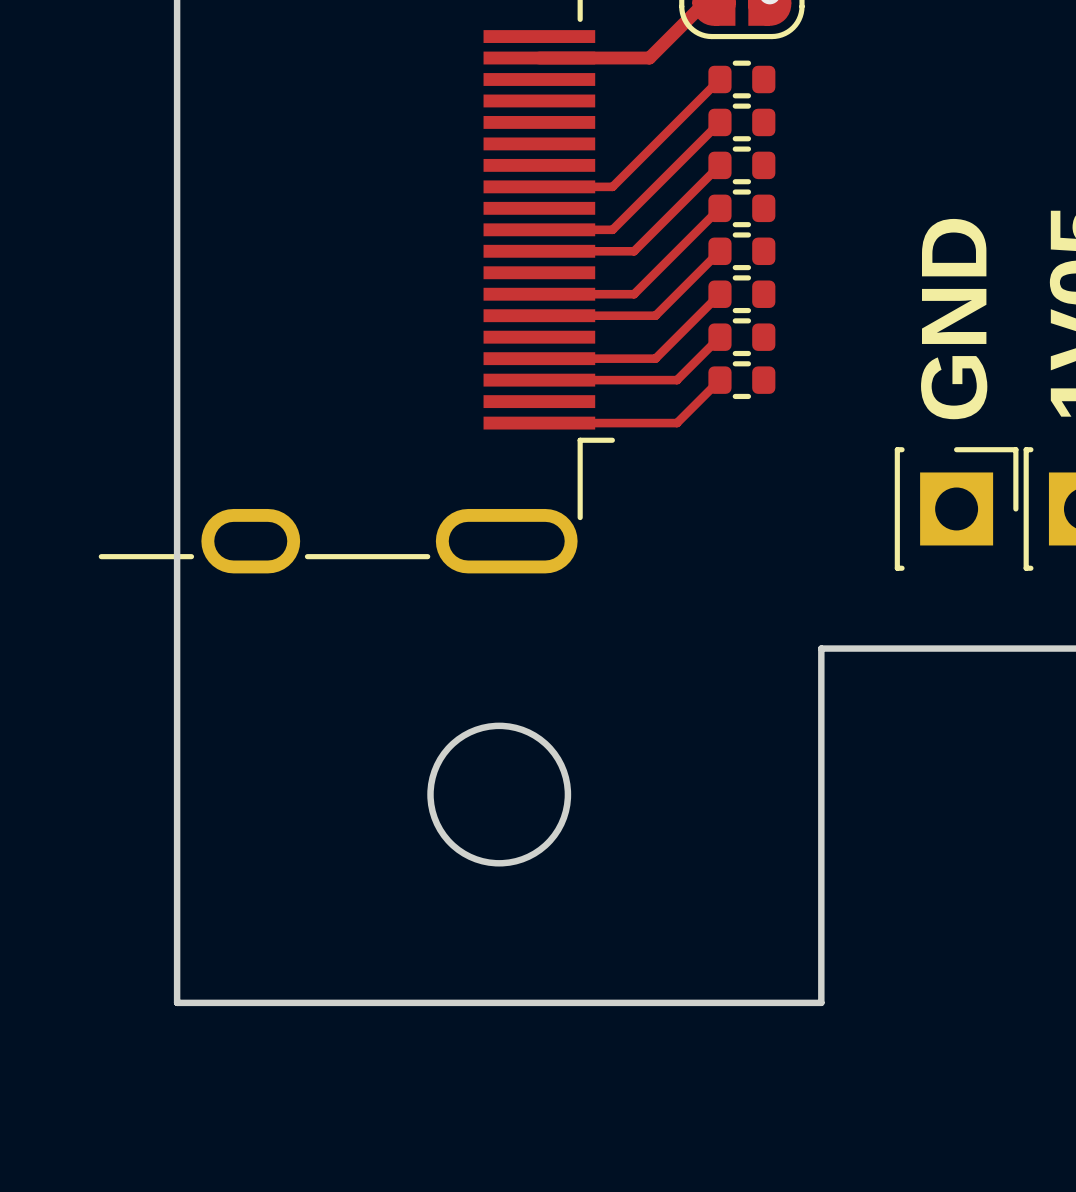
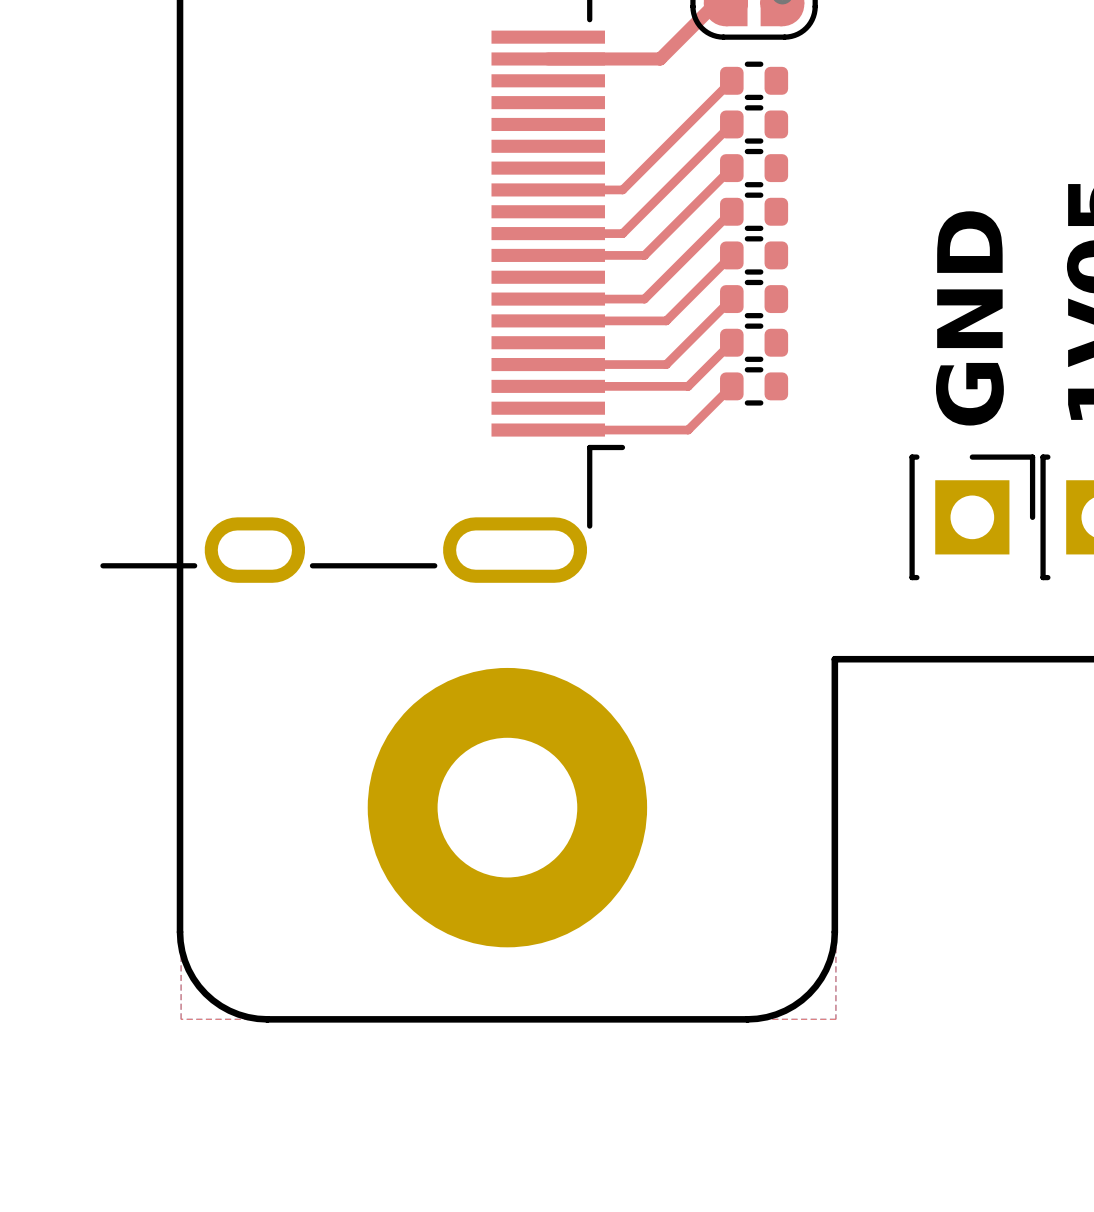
board edge: (821, 648) (821, 1002) (177, 1002) (177, 916) -> (834, 659) (834, 941) (829, 960) (821, 978) (809, 993) (793, 1005) (766, 1017) (747, 1019) (267, 1019)
round board edge: [427, 722, 572, 867] -> none
part: none -> (507, 807)
board edge: none -> (180, 932) (182, 951) (188, 969) (205, 993) (229, 1010) (247, 1017) (267, 1019)

